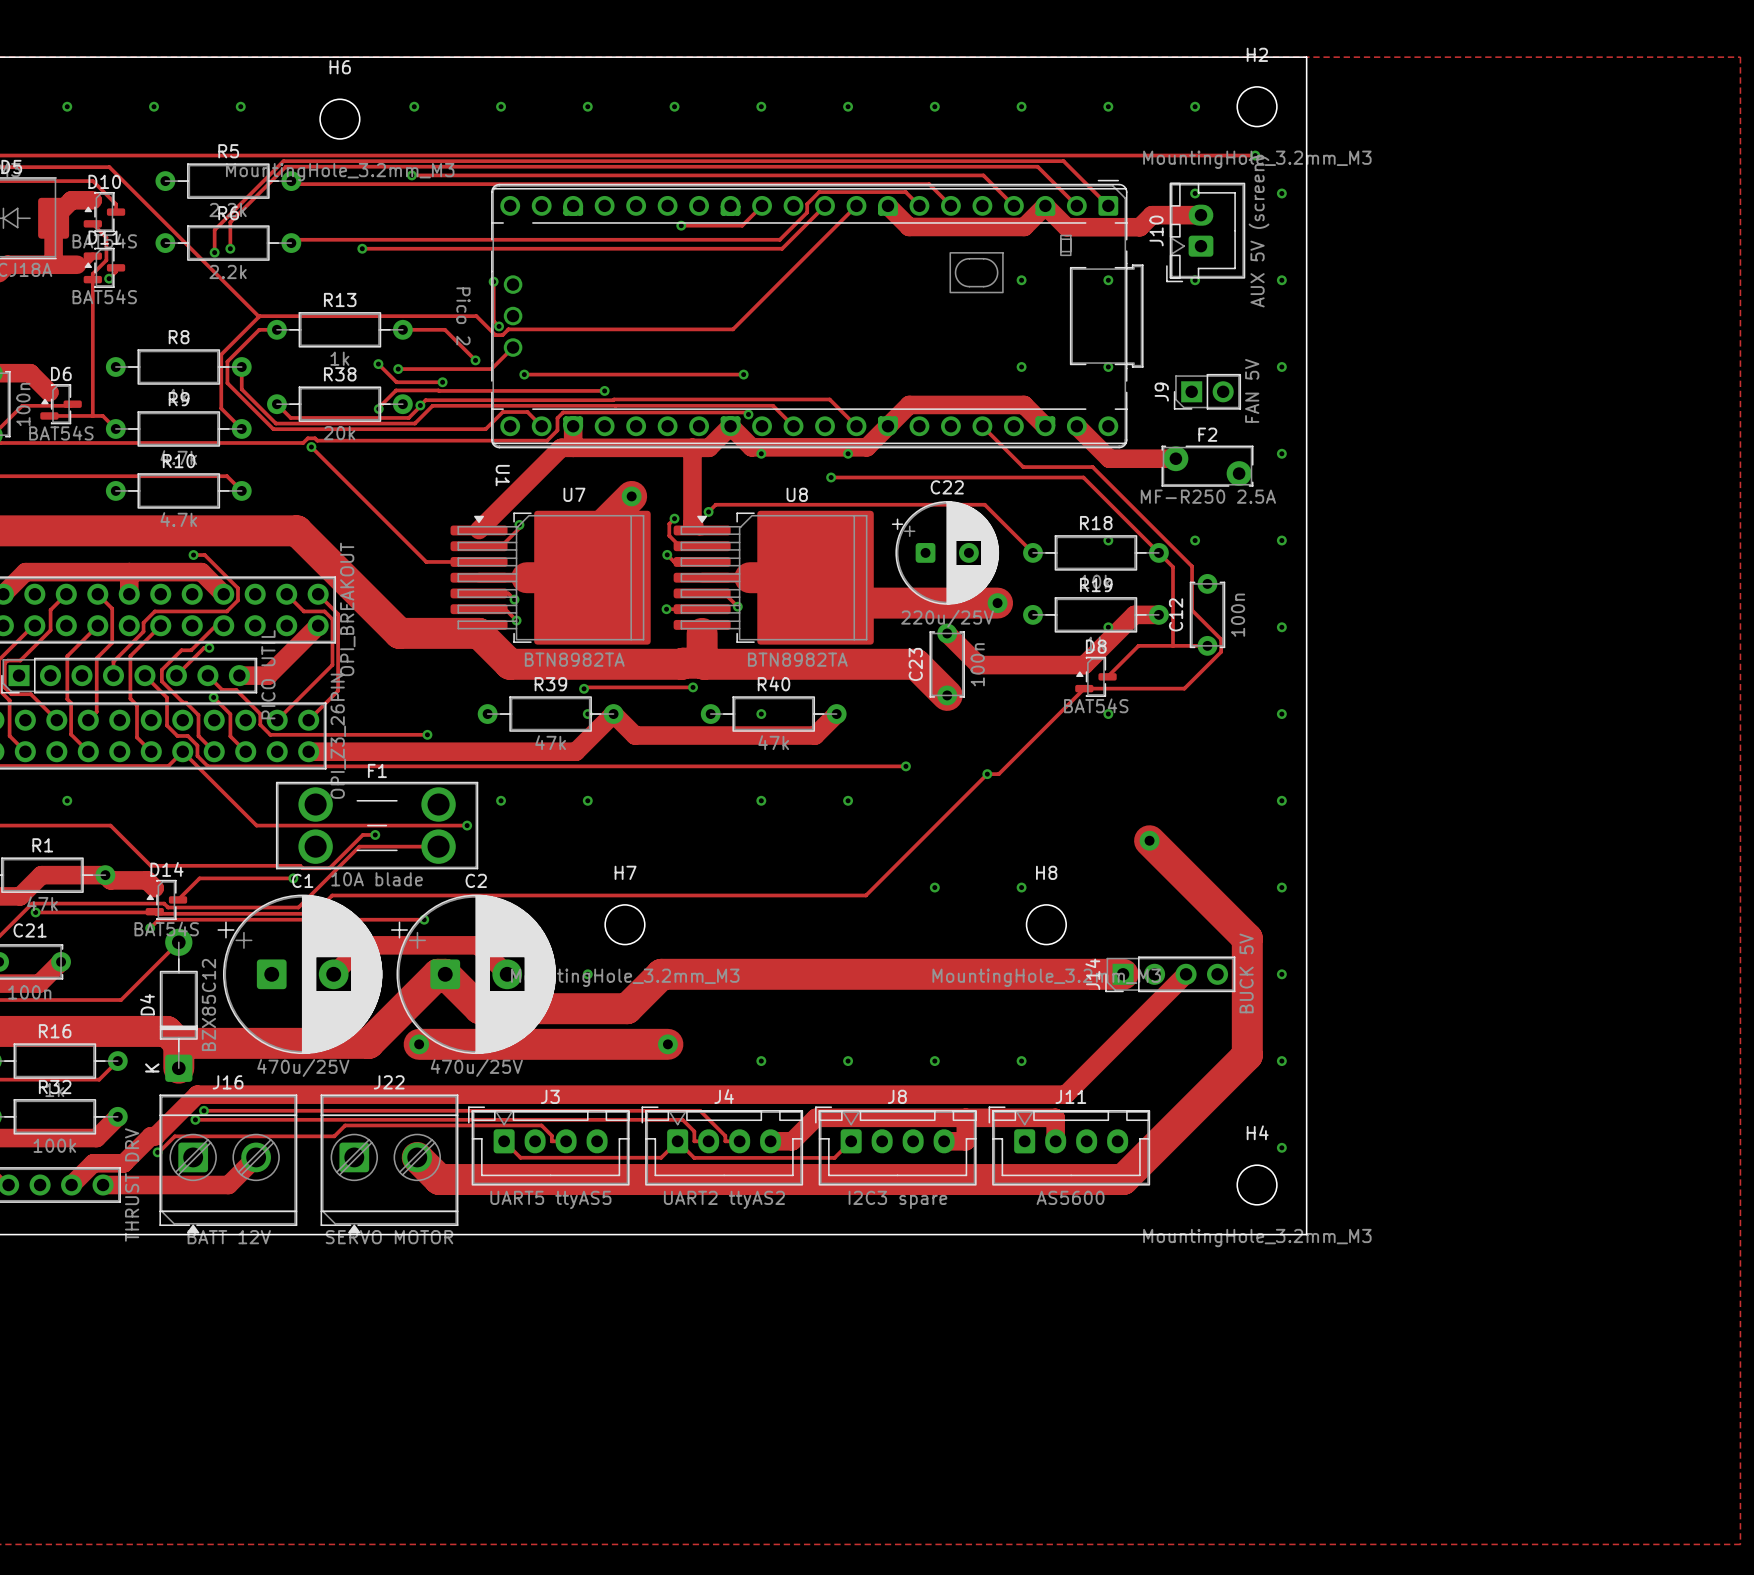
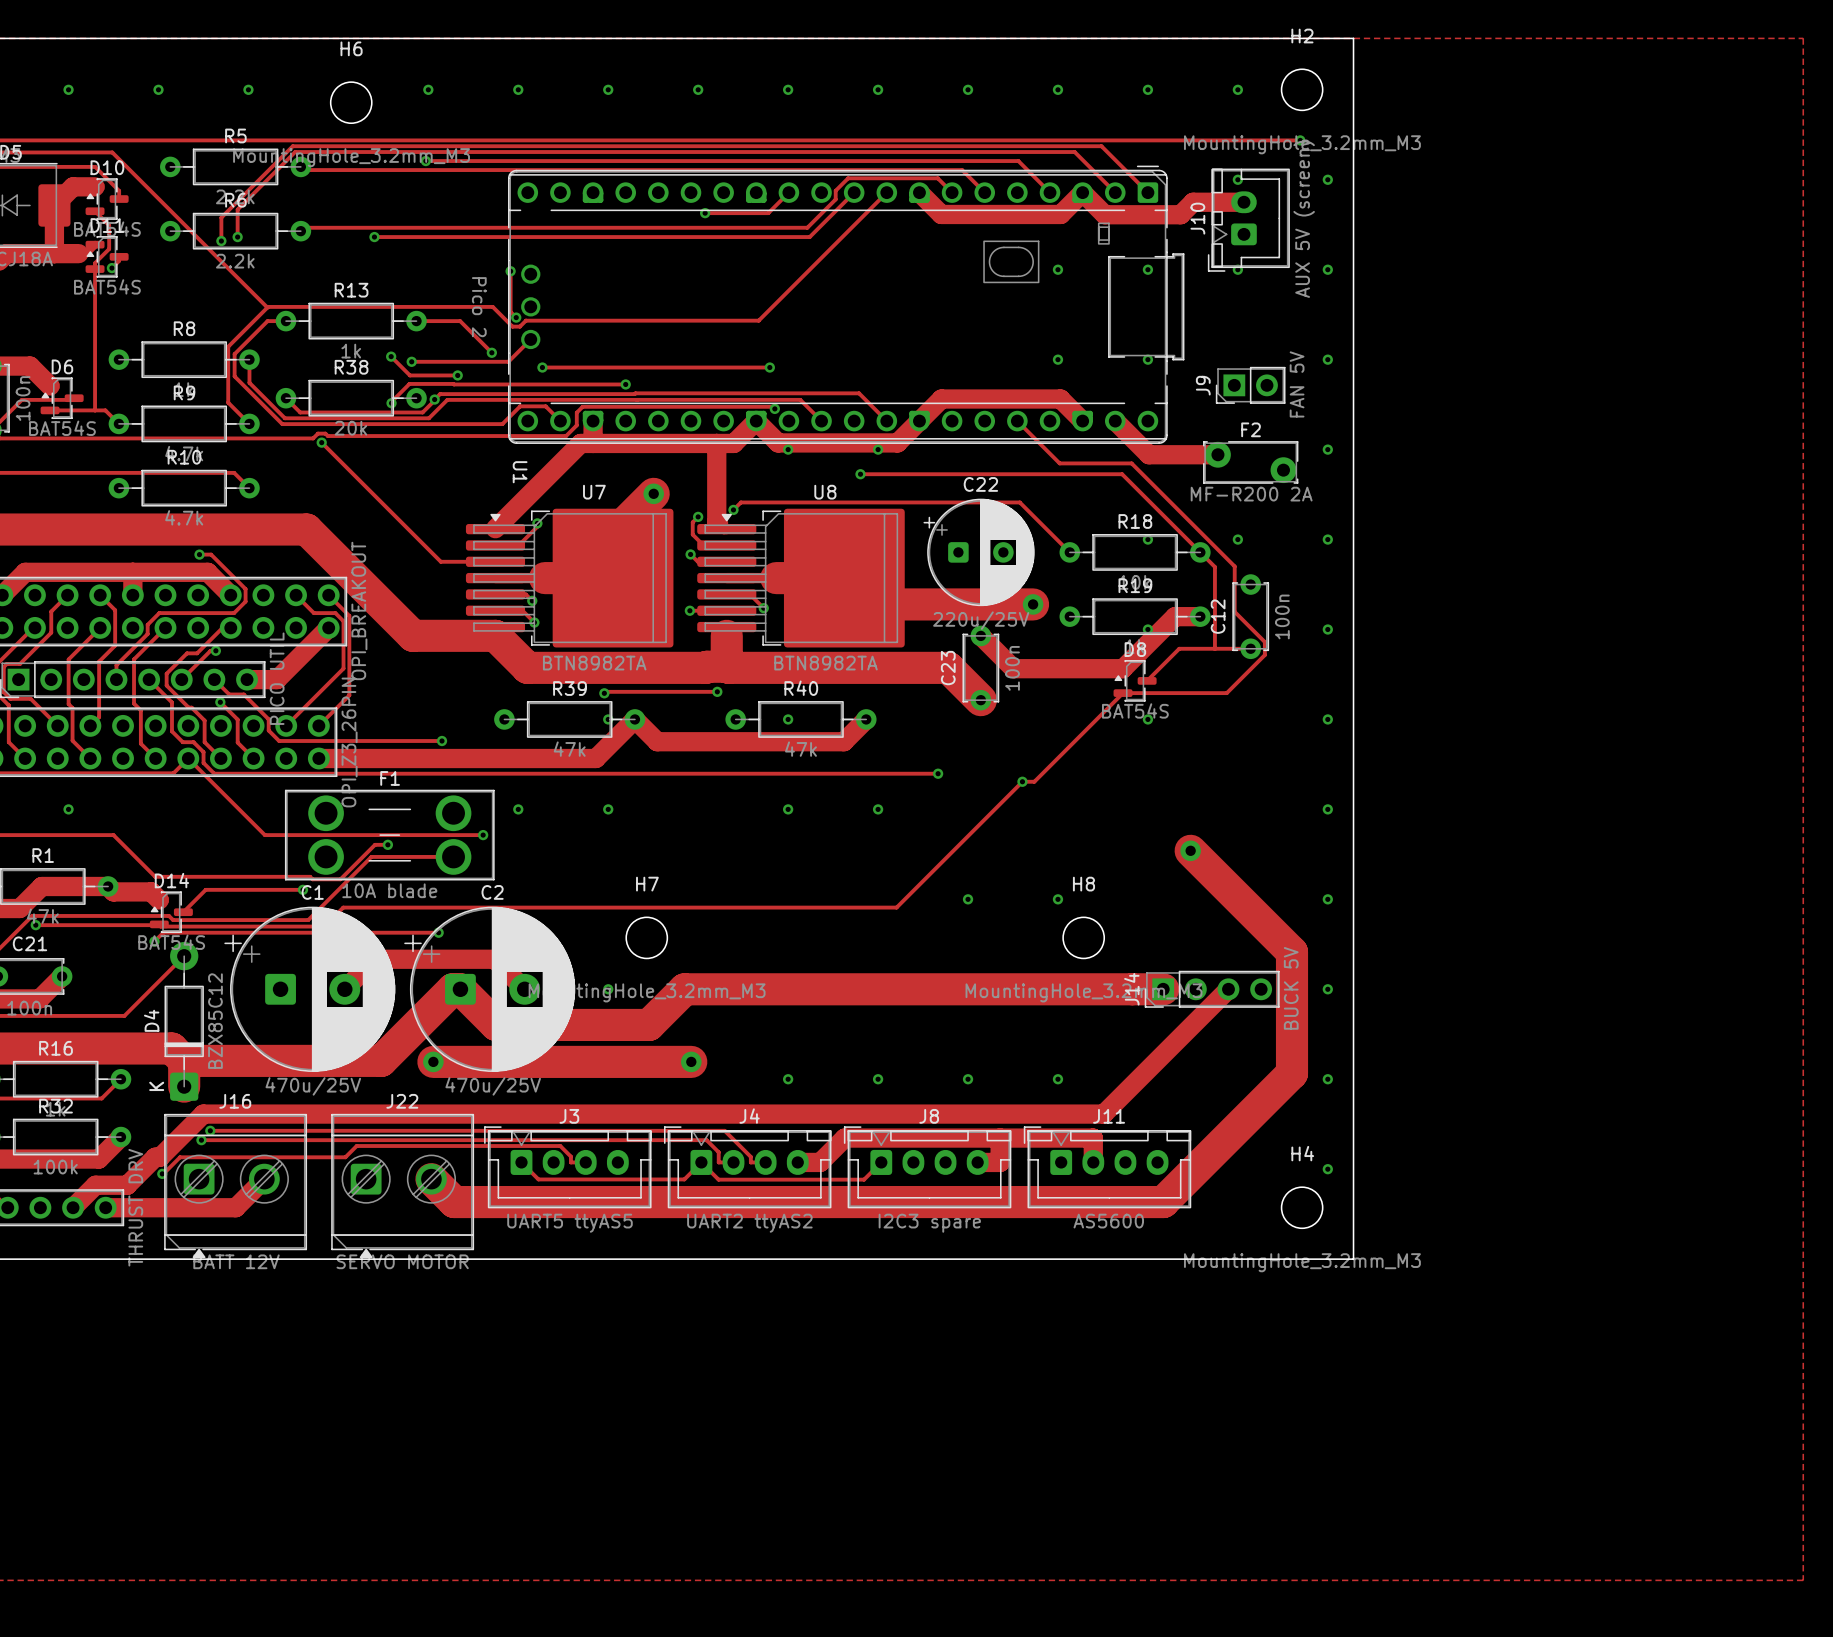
F2 value: MF-R250 2.5A (1208, 496) -> MF-R200 2A (1251, 494)

